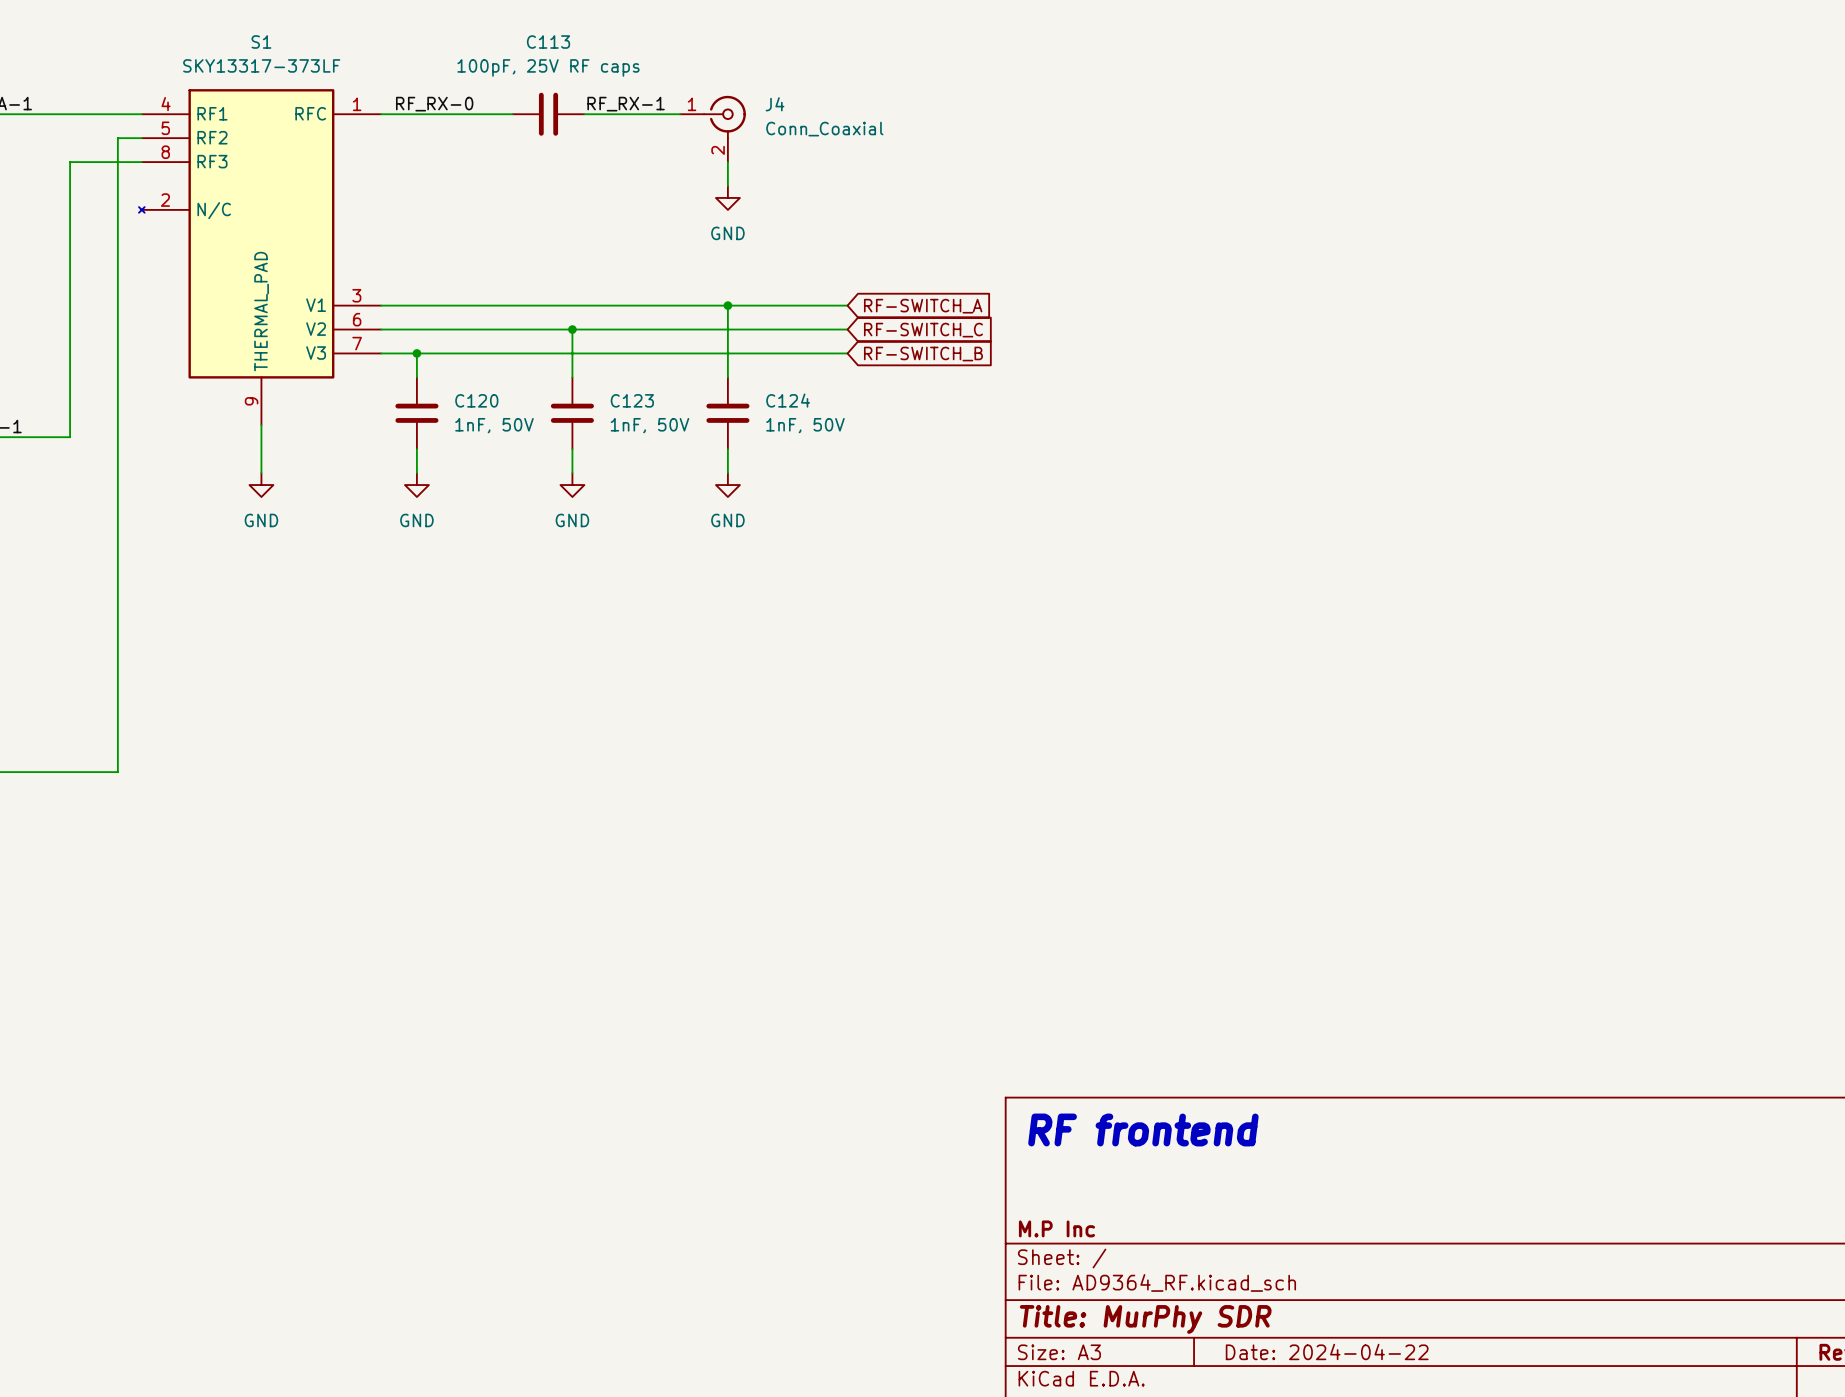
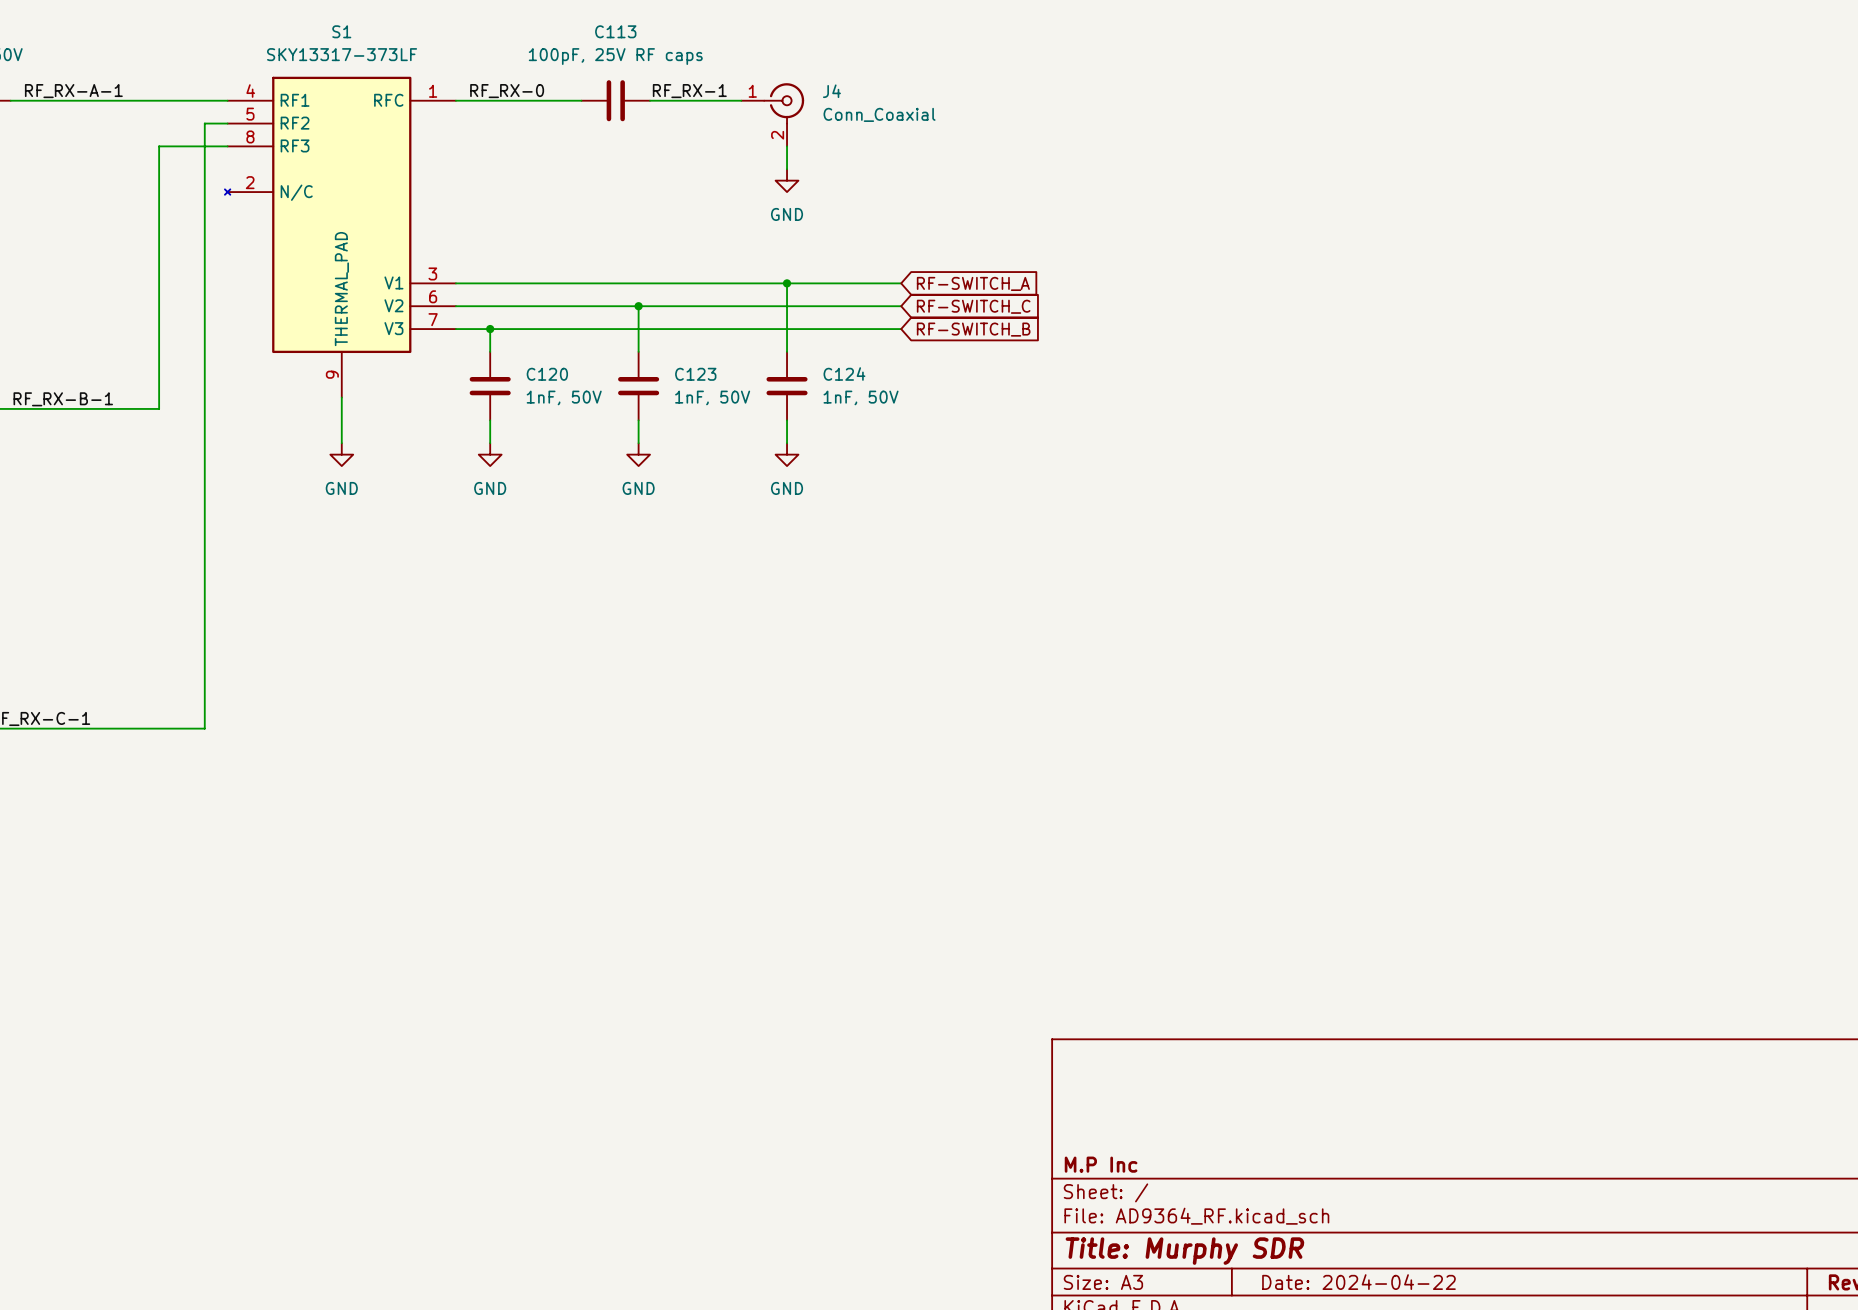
text: RF frontend (1143, 1129) -> none
title block: Title: MurPhy SDR (1145, 1319) -> Title: Murphy SDR (1184, 1251)

